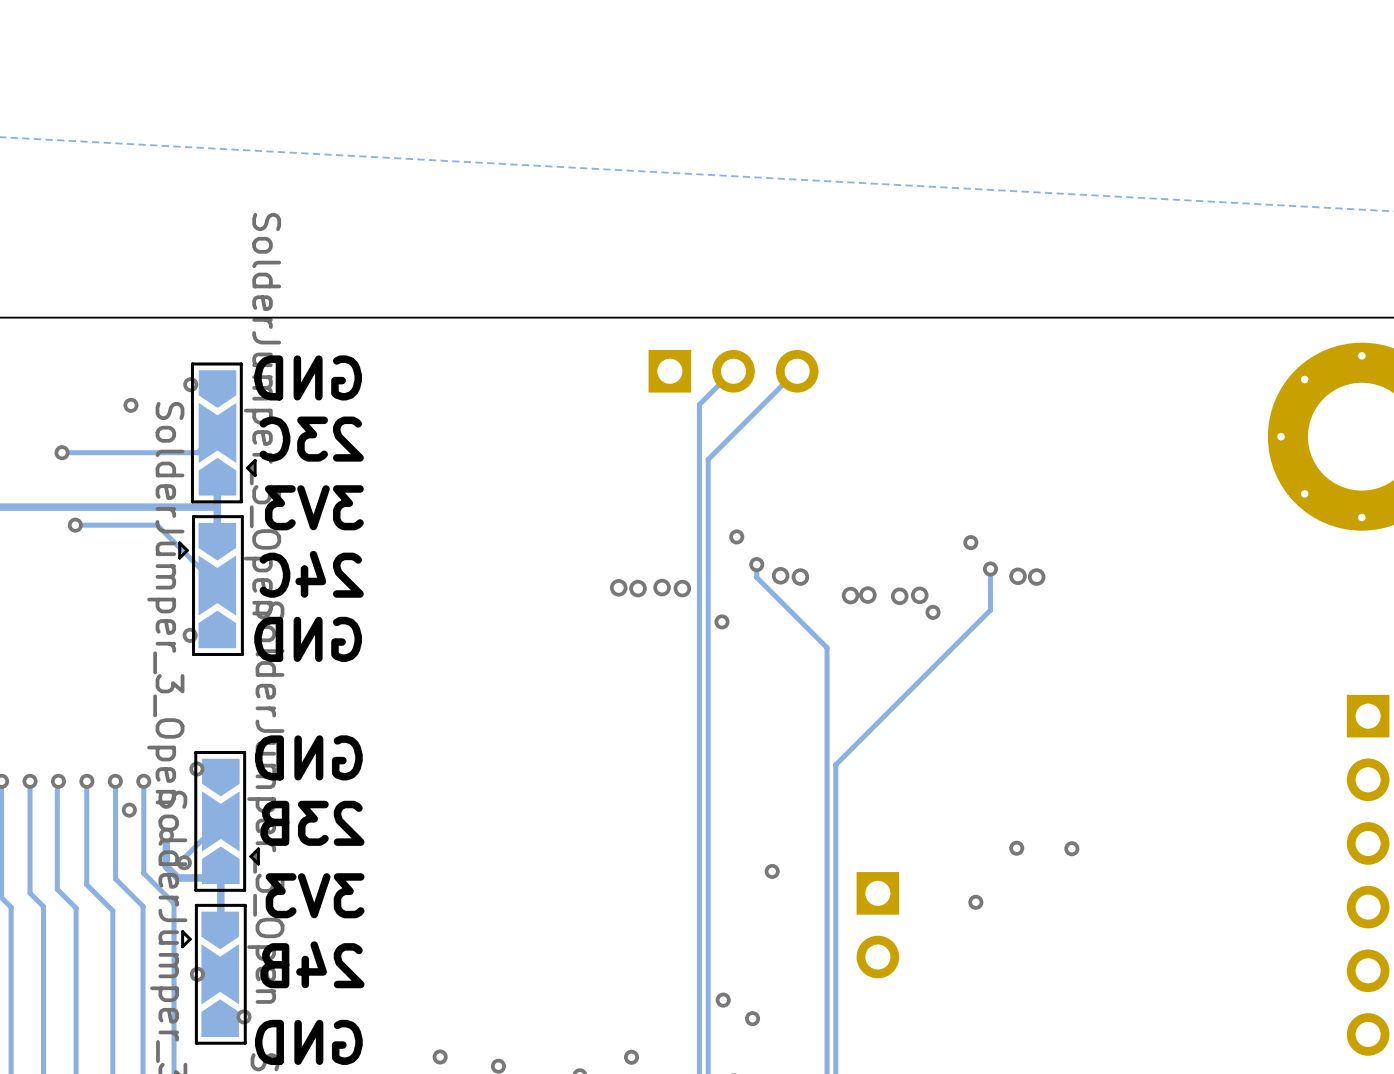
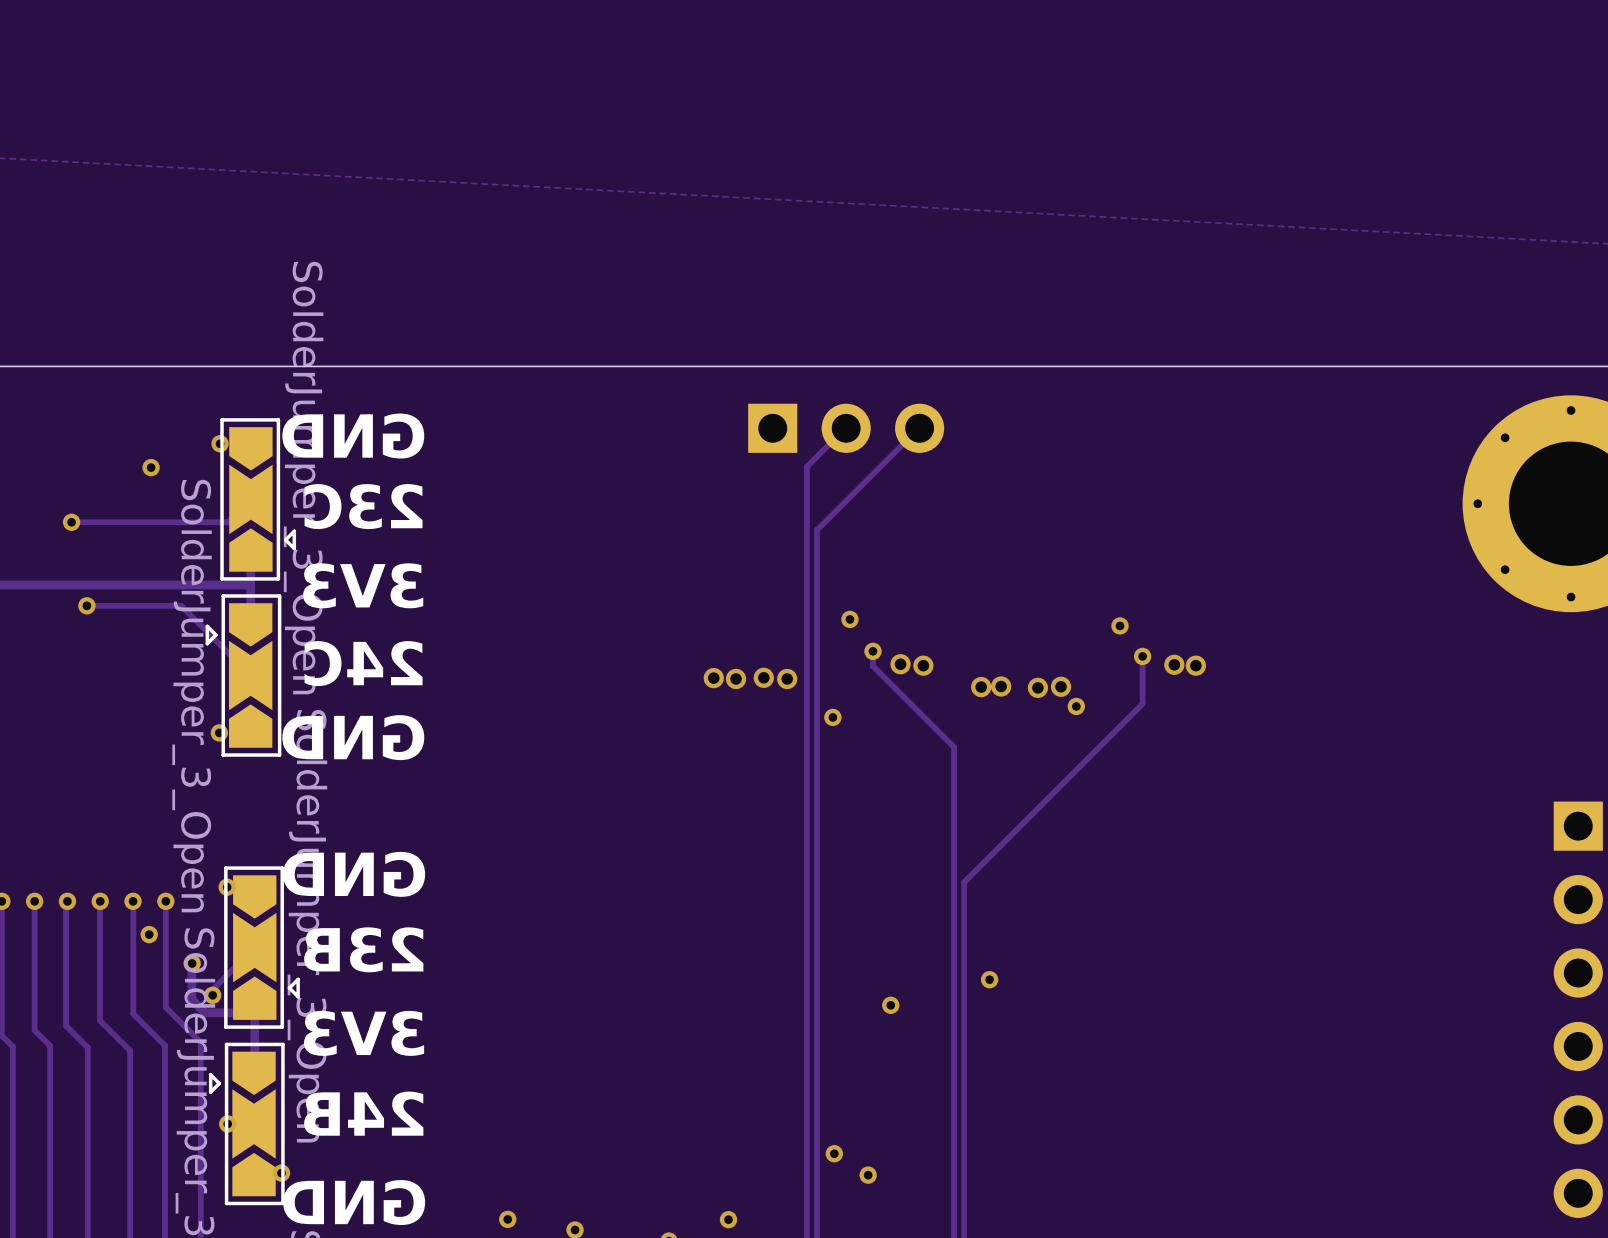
via: (1016, 848) -> none
via: (1071, 848) -> none
via: none -> (989, 979)
via: (975, 902) -> none
part: (877, 925) -> none

